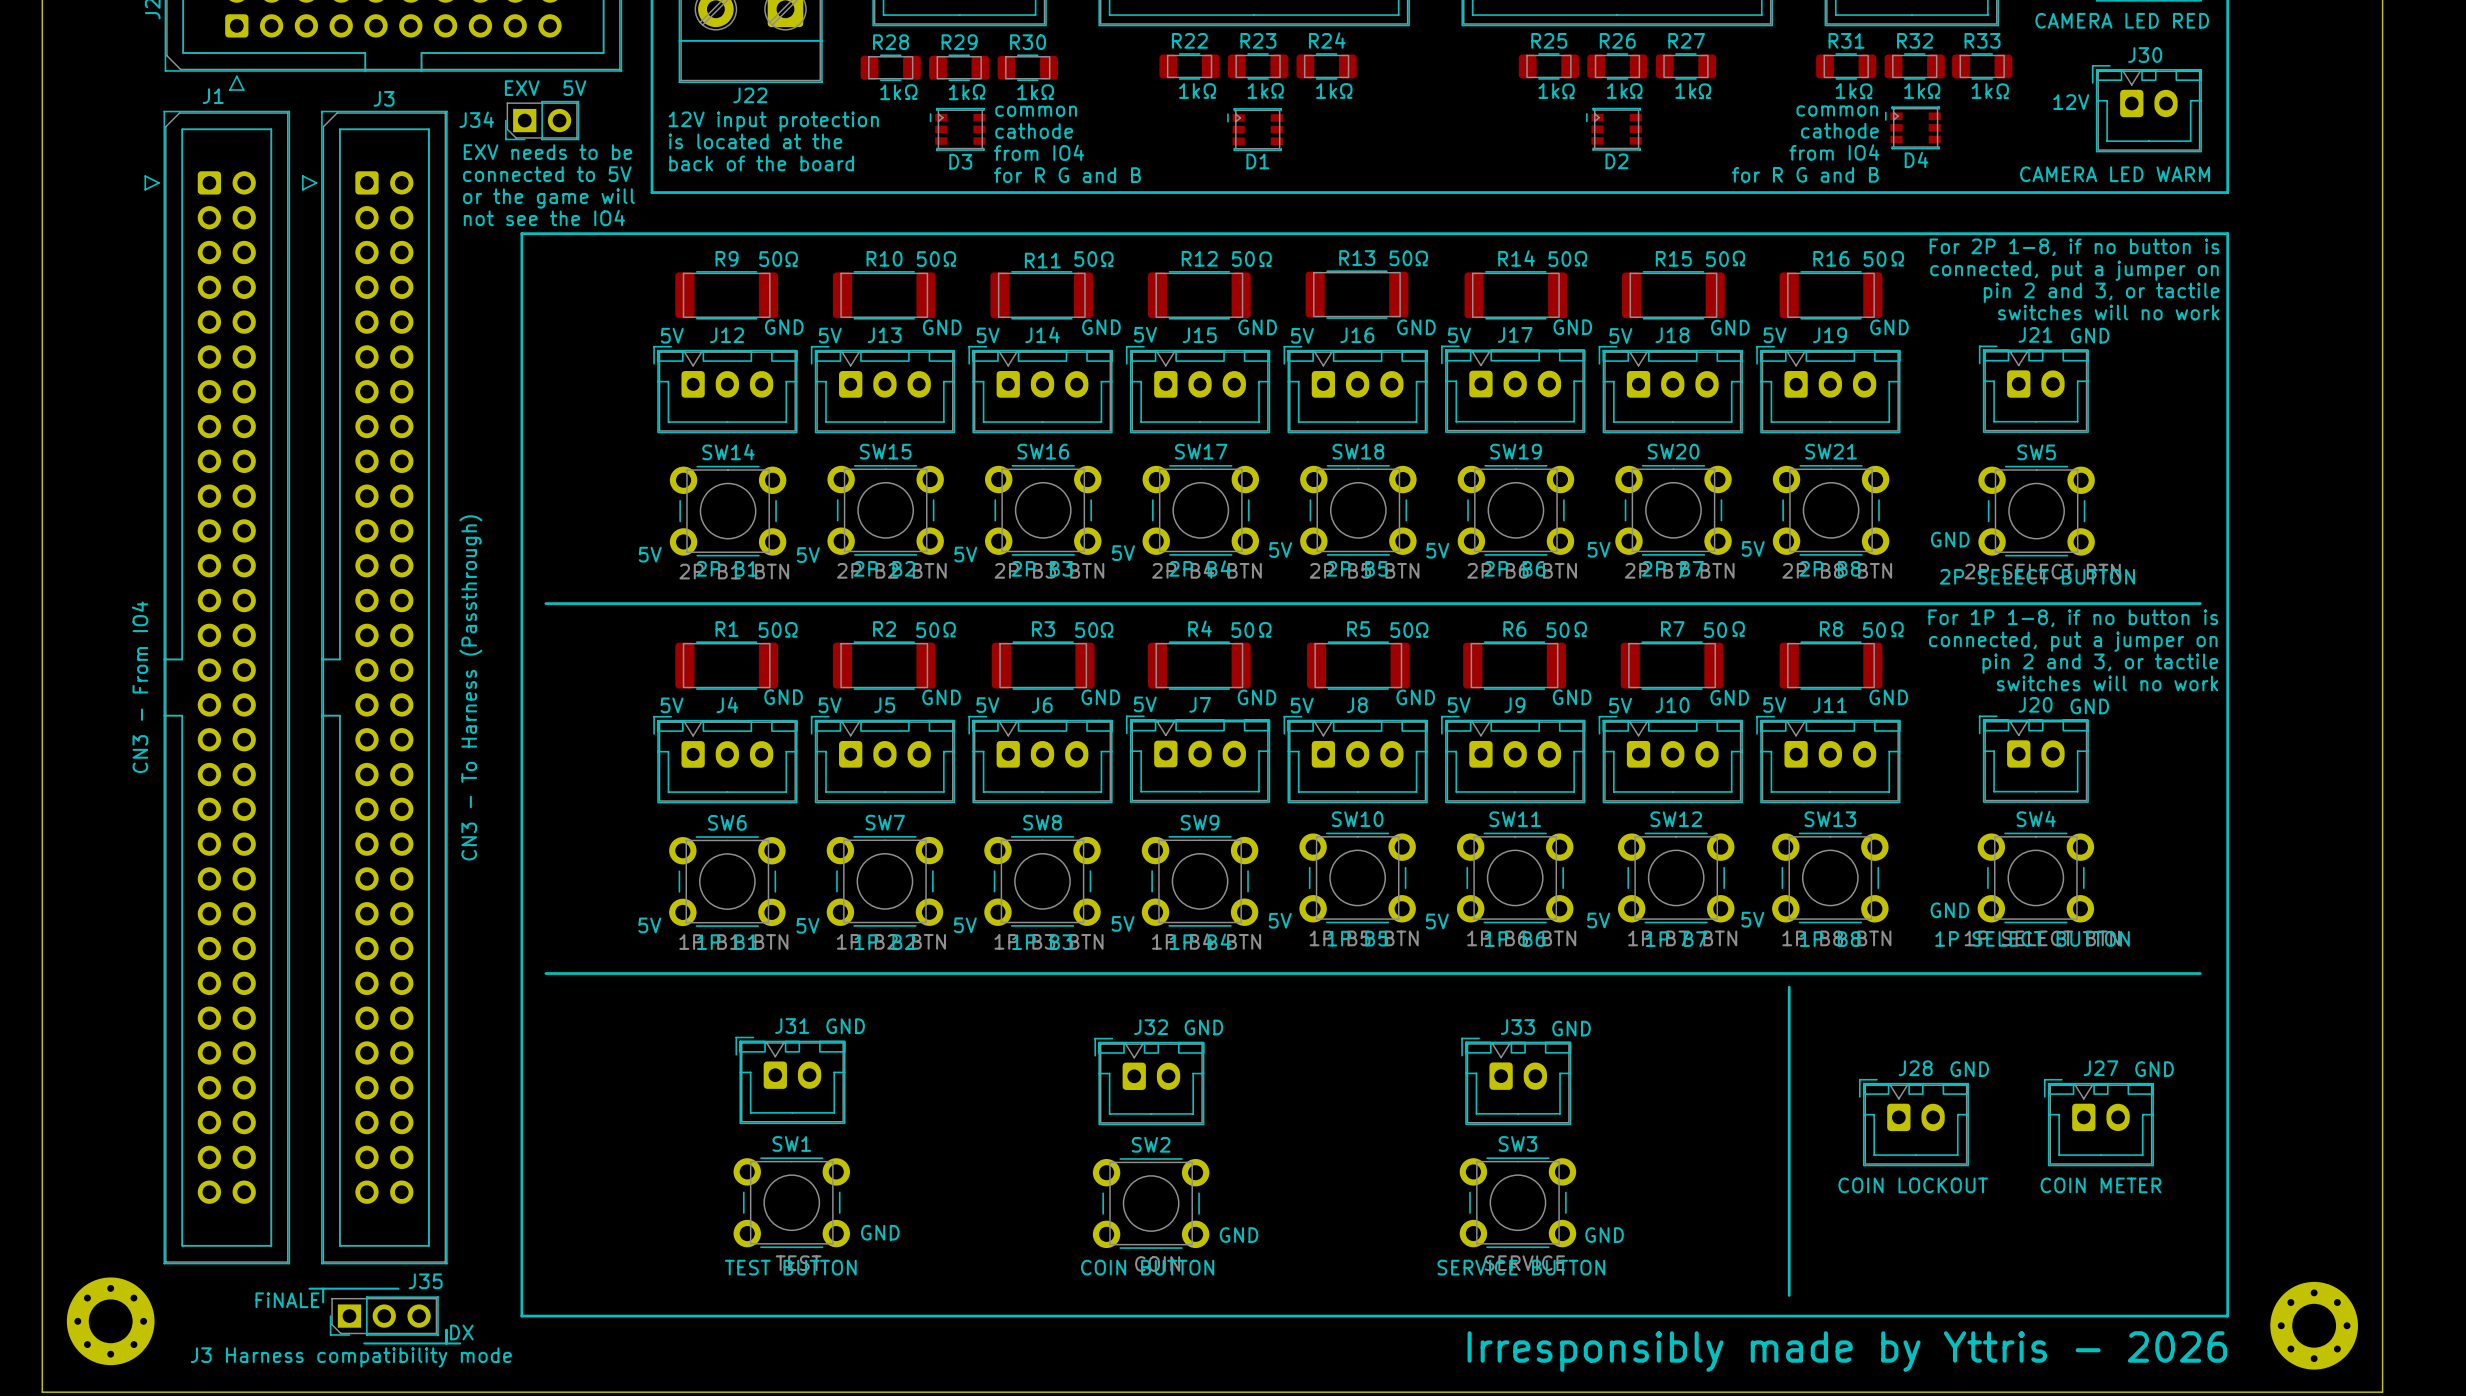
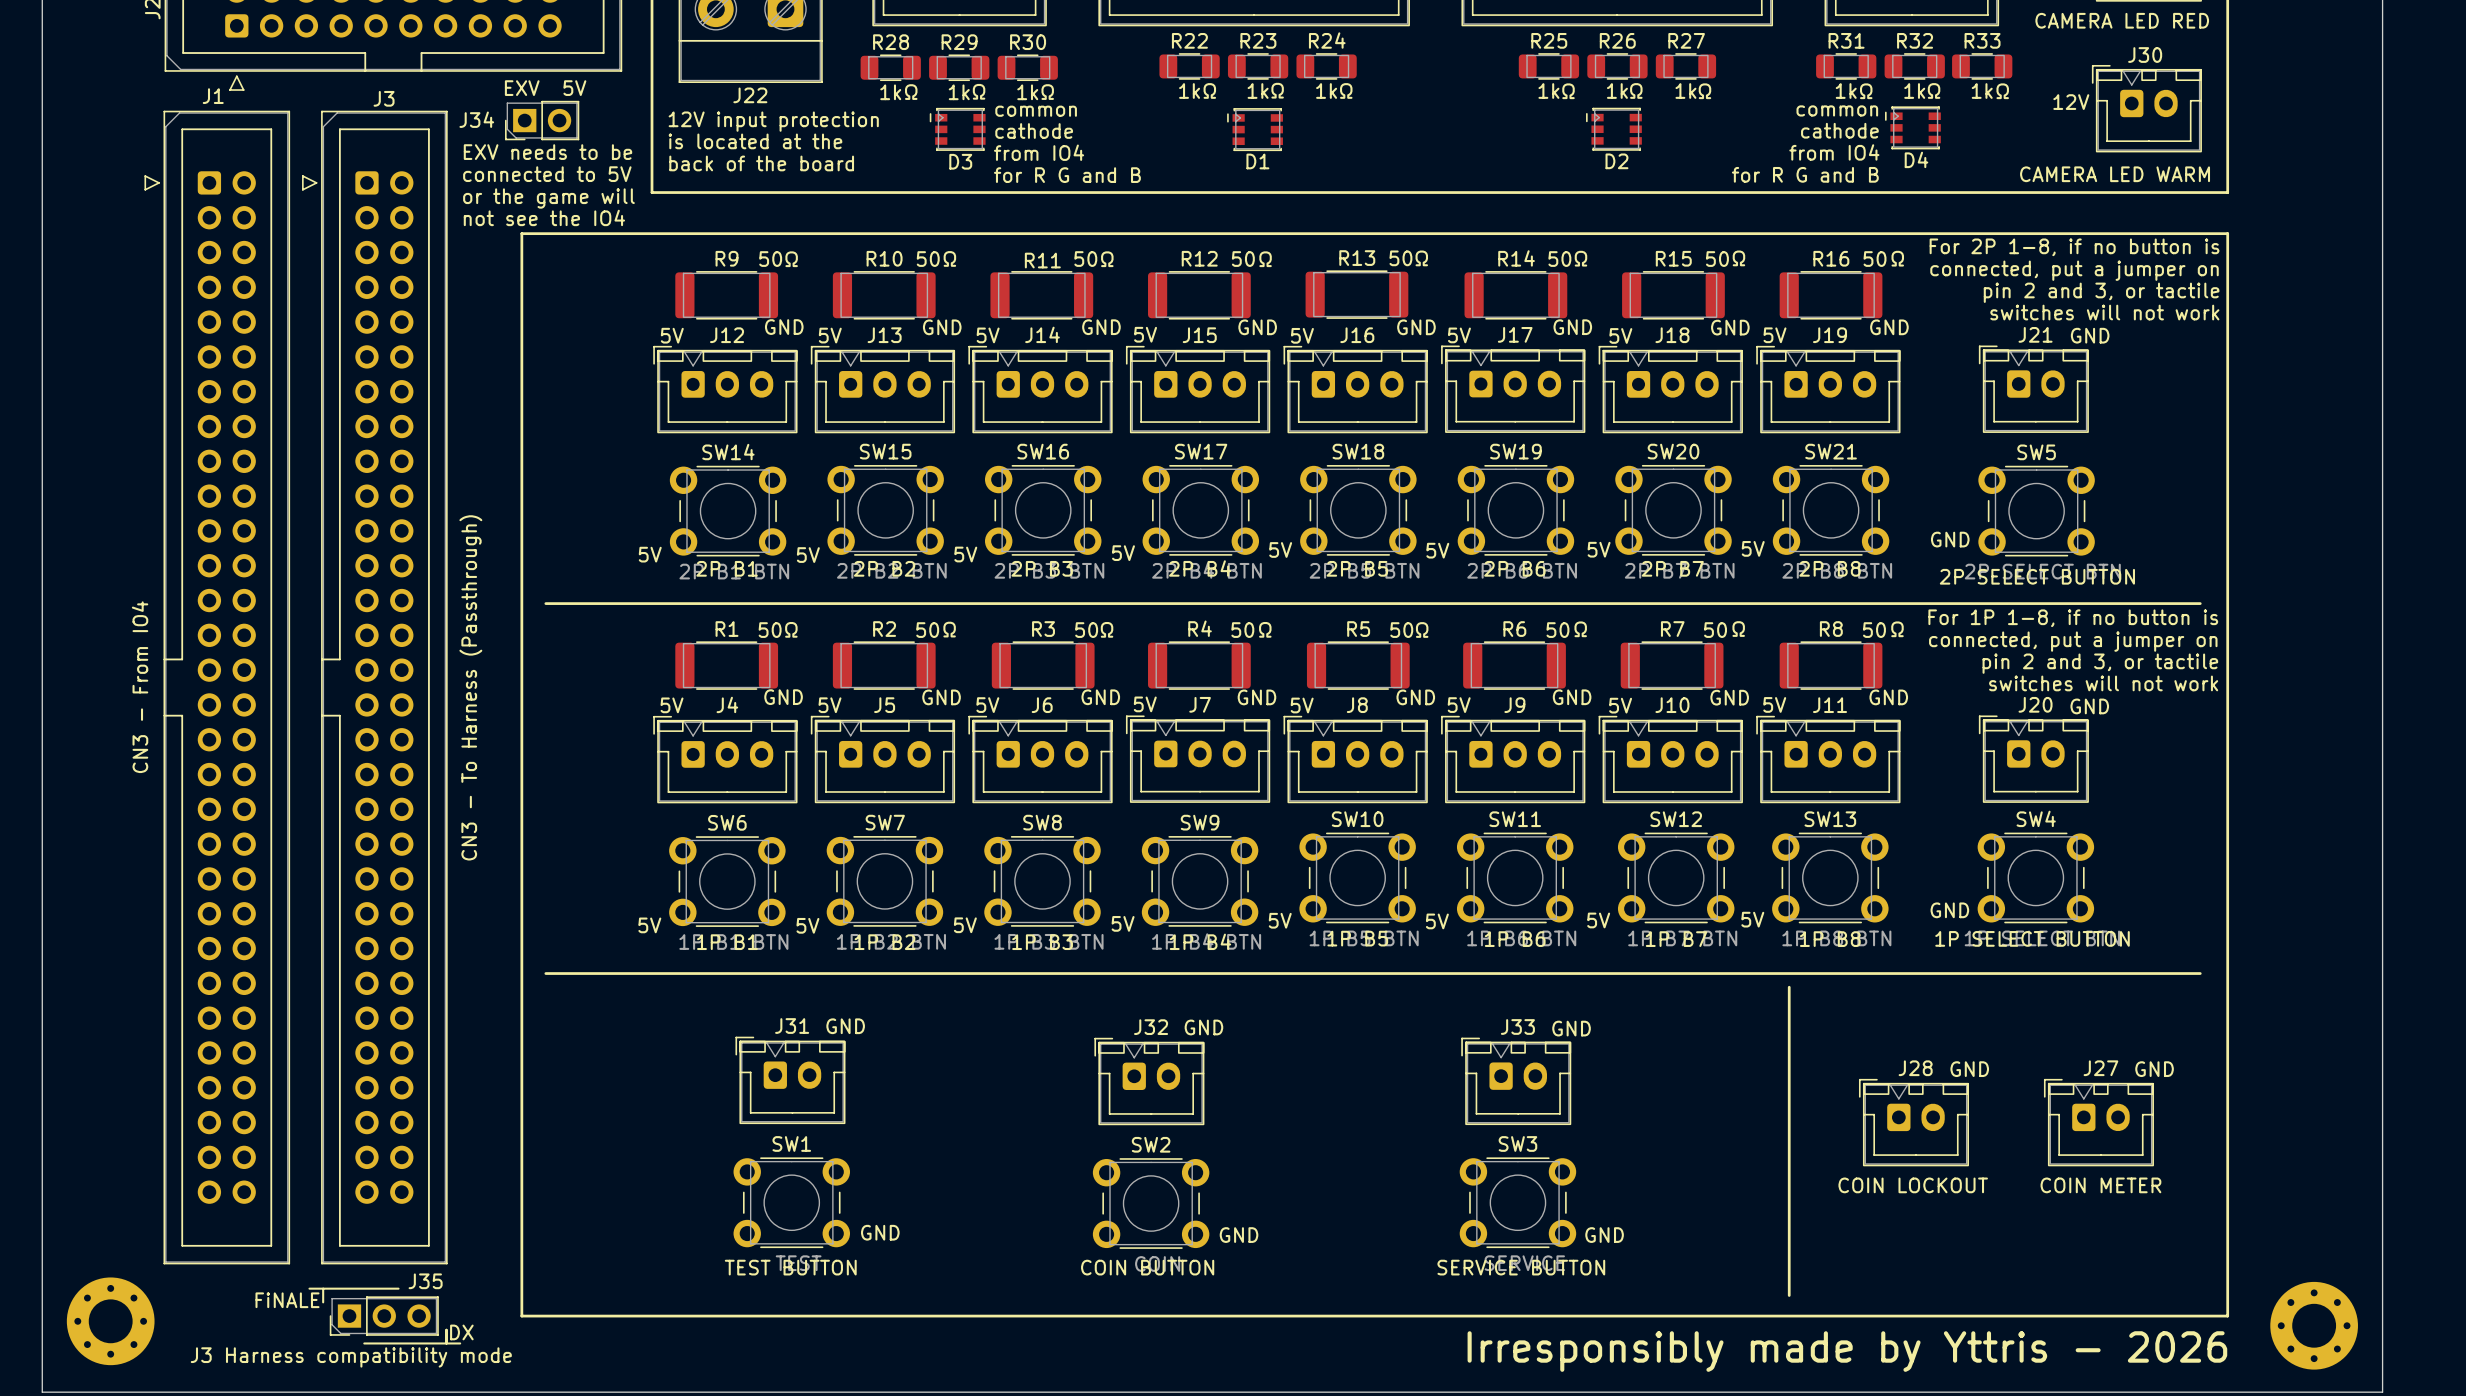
text: switches will no work (2108, 312) -> switches will not work (2104, 312)
text: switches will no work (2107, 683) -> switches will not work (2103, 683)

